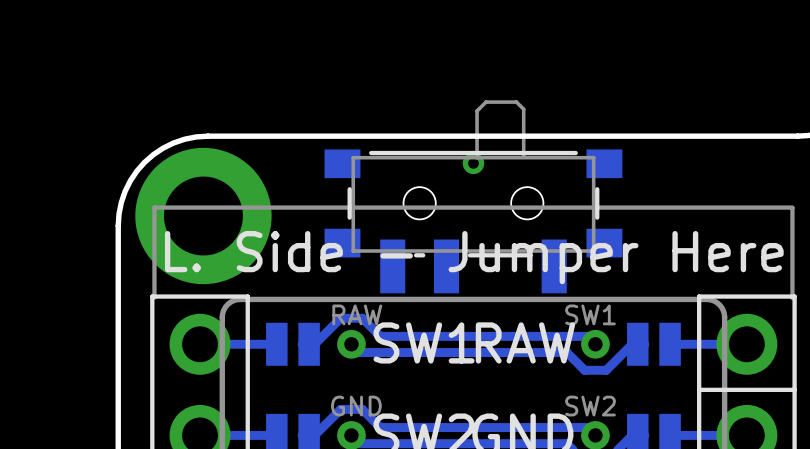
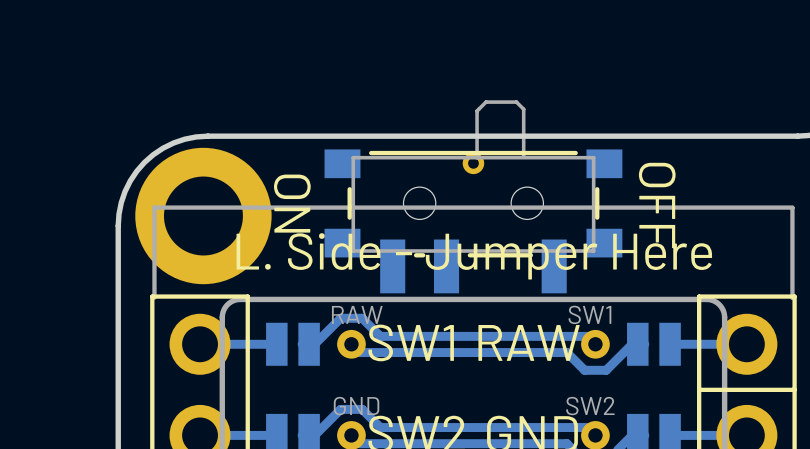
part text: none -> ON (292, 203)
part text: none -> OFF (657, 205)

